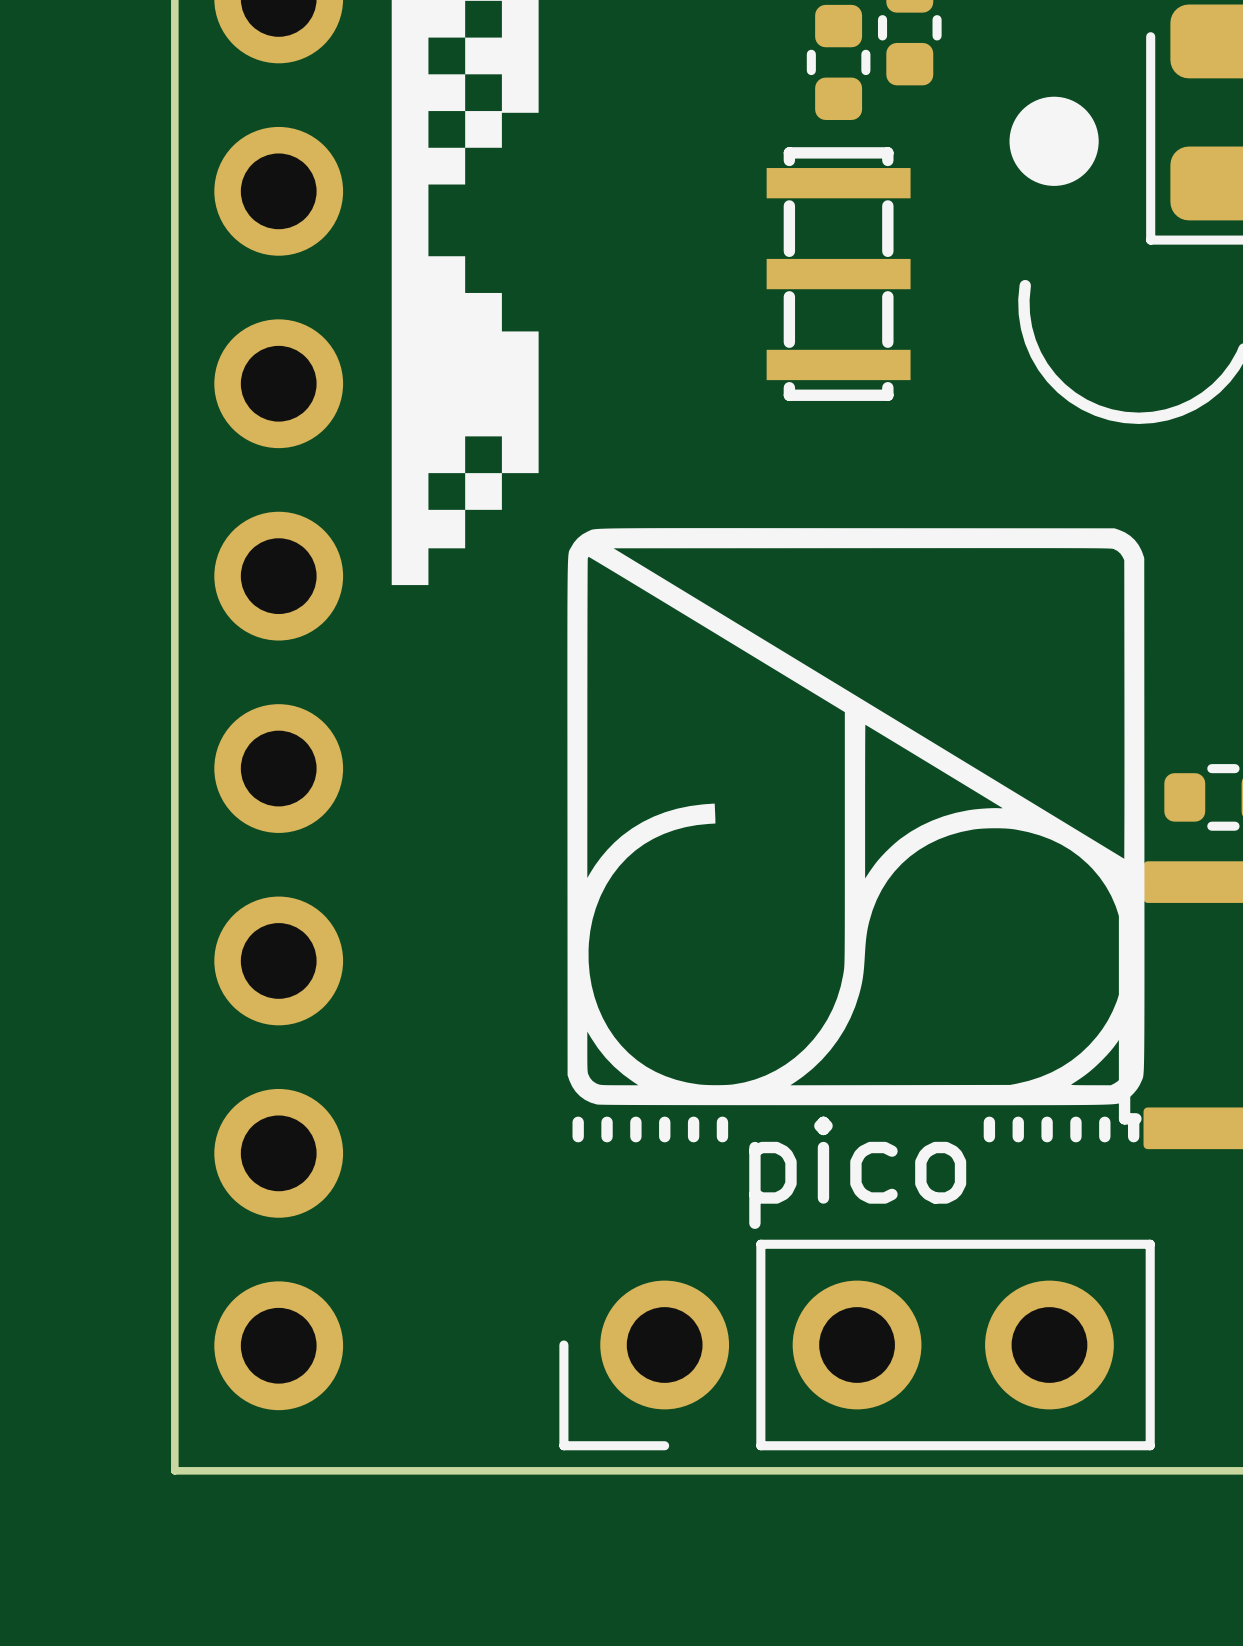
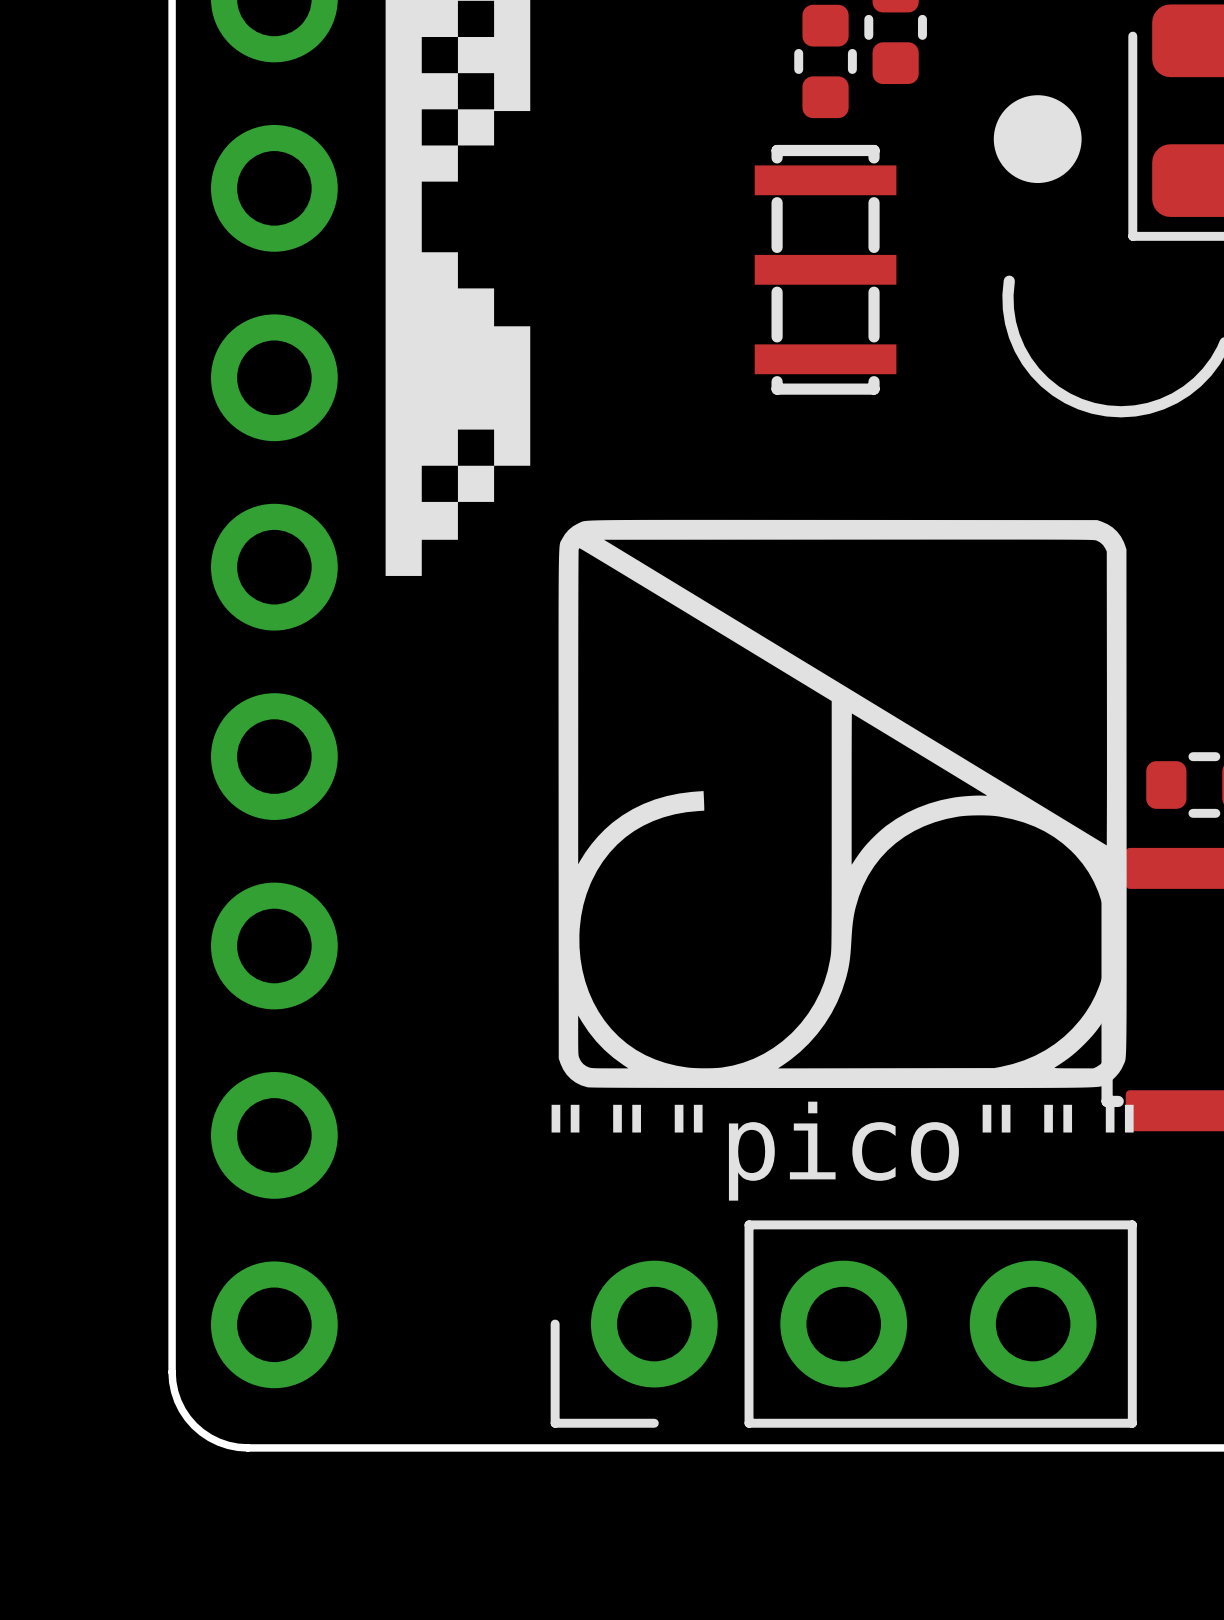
board edge: (174, 1393) (174, 1470) (251, 1470) -> (172, 1372) (177, 1401) (194, 1425) (218, 1442) (247, 1447)

